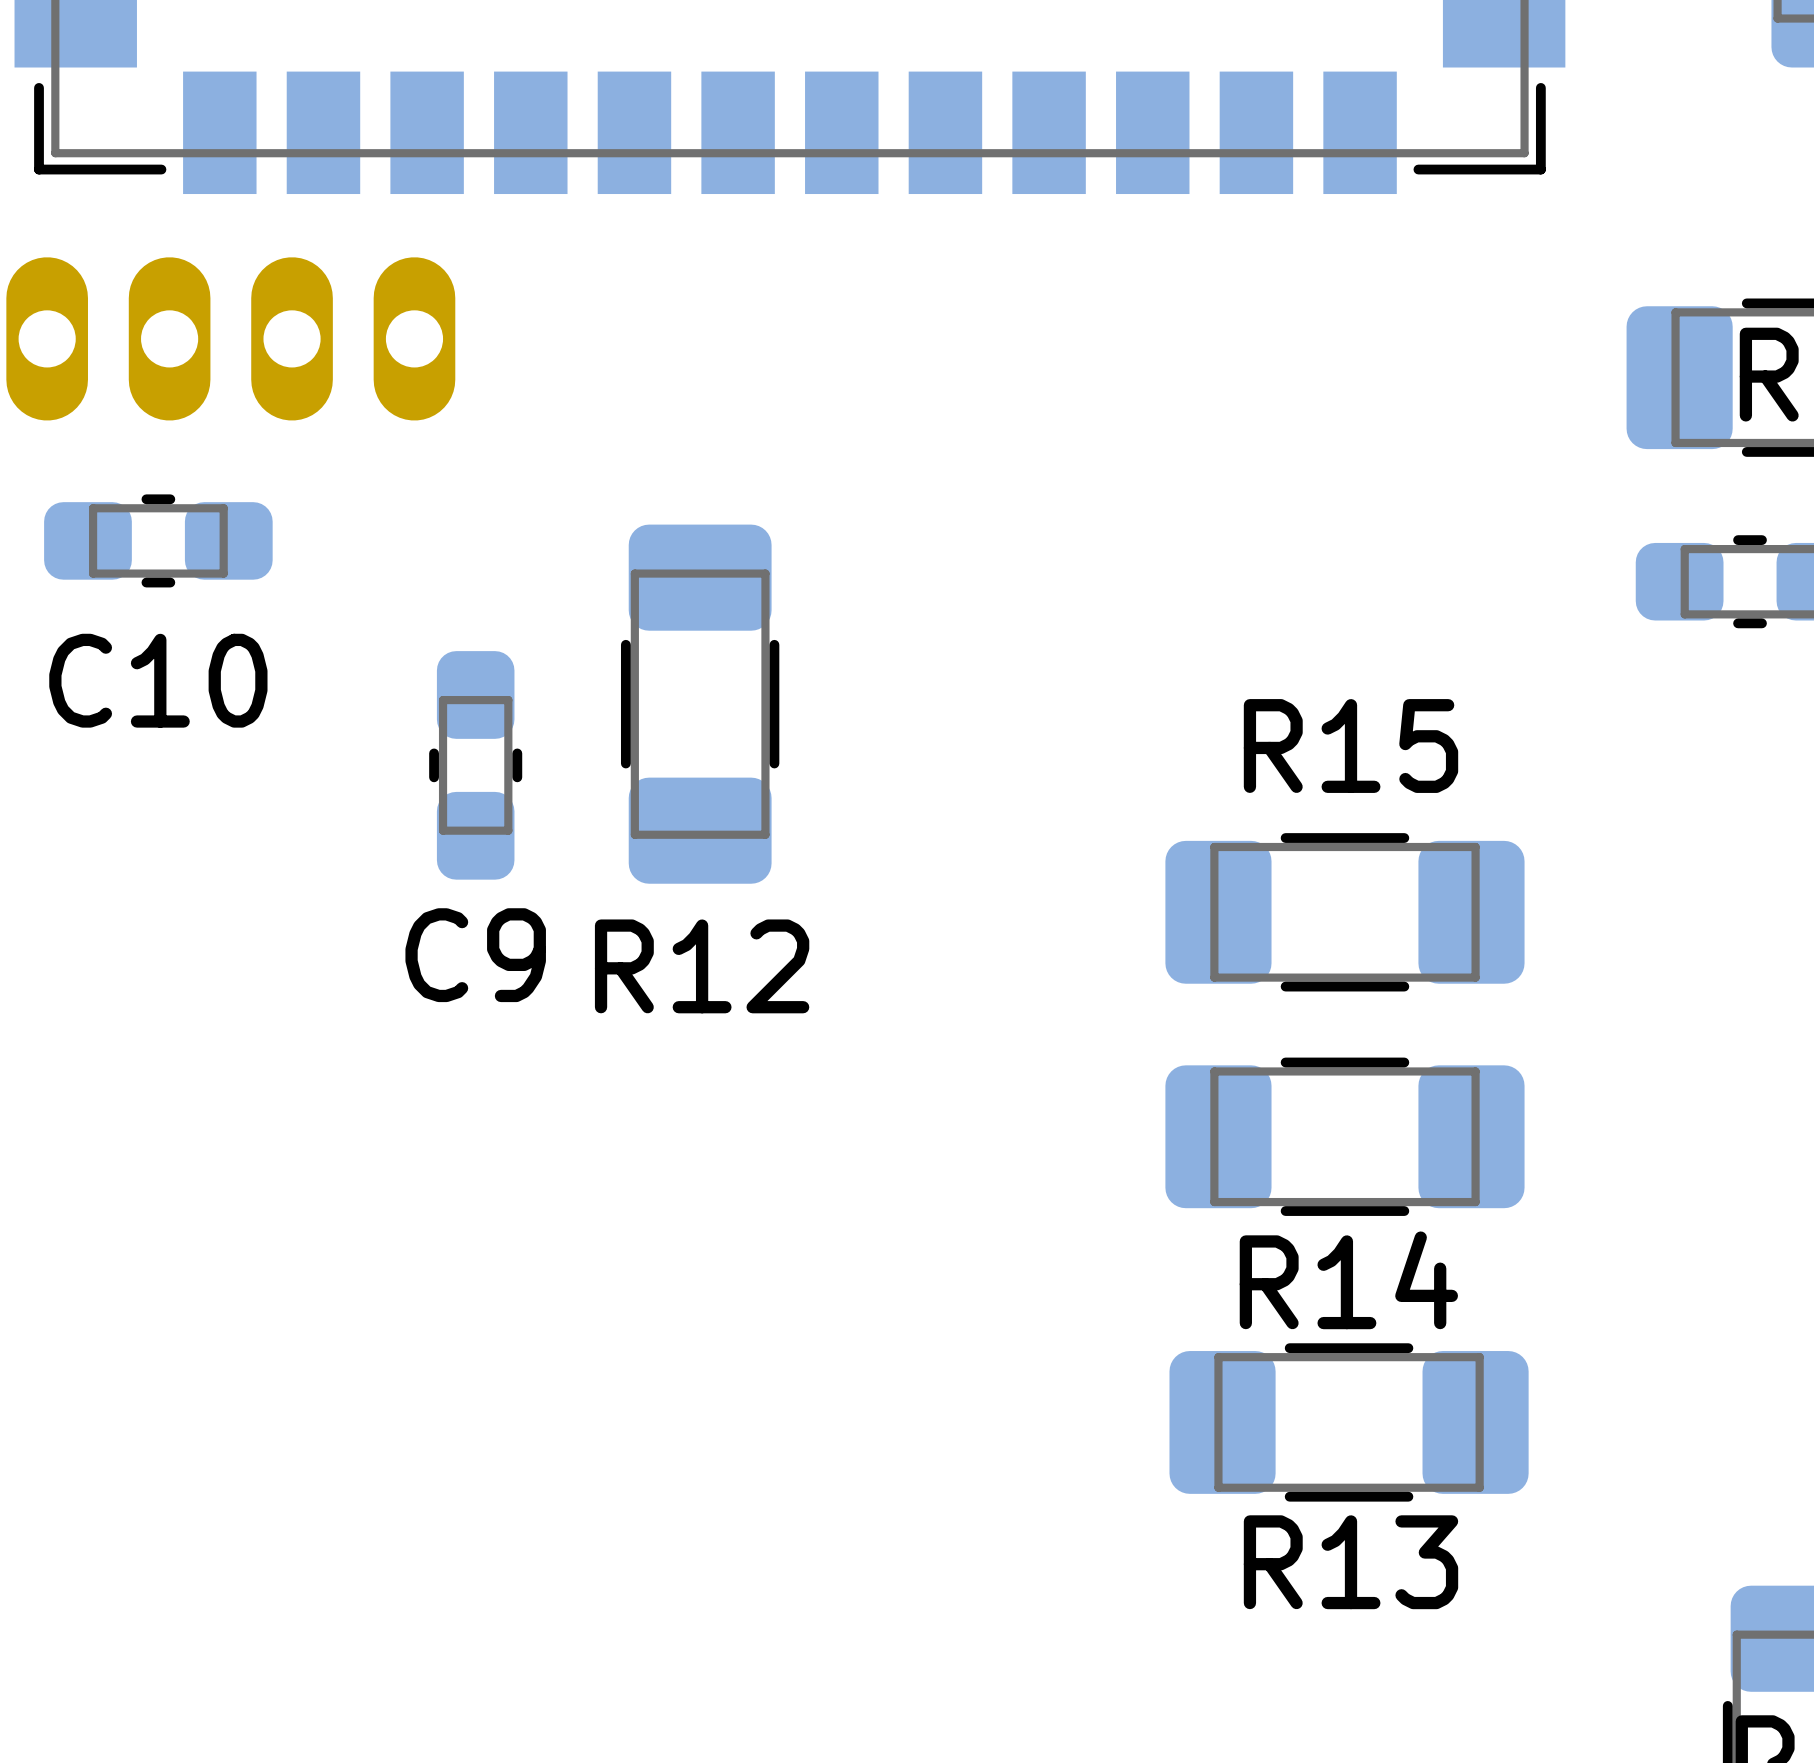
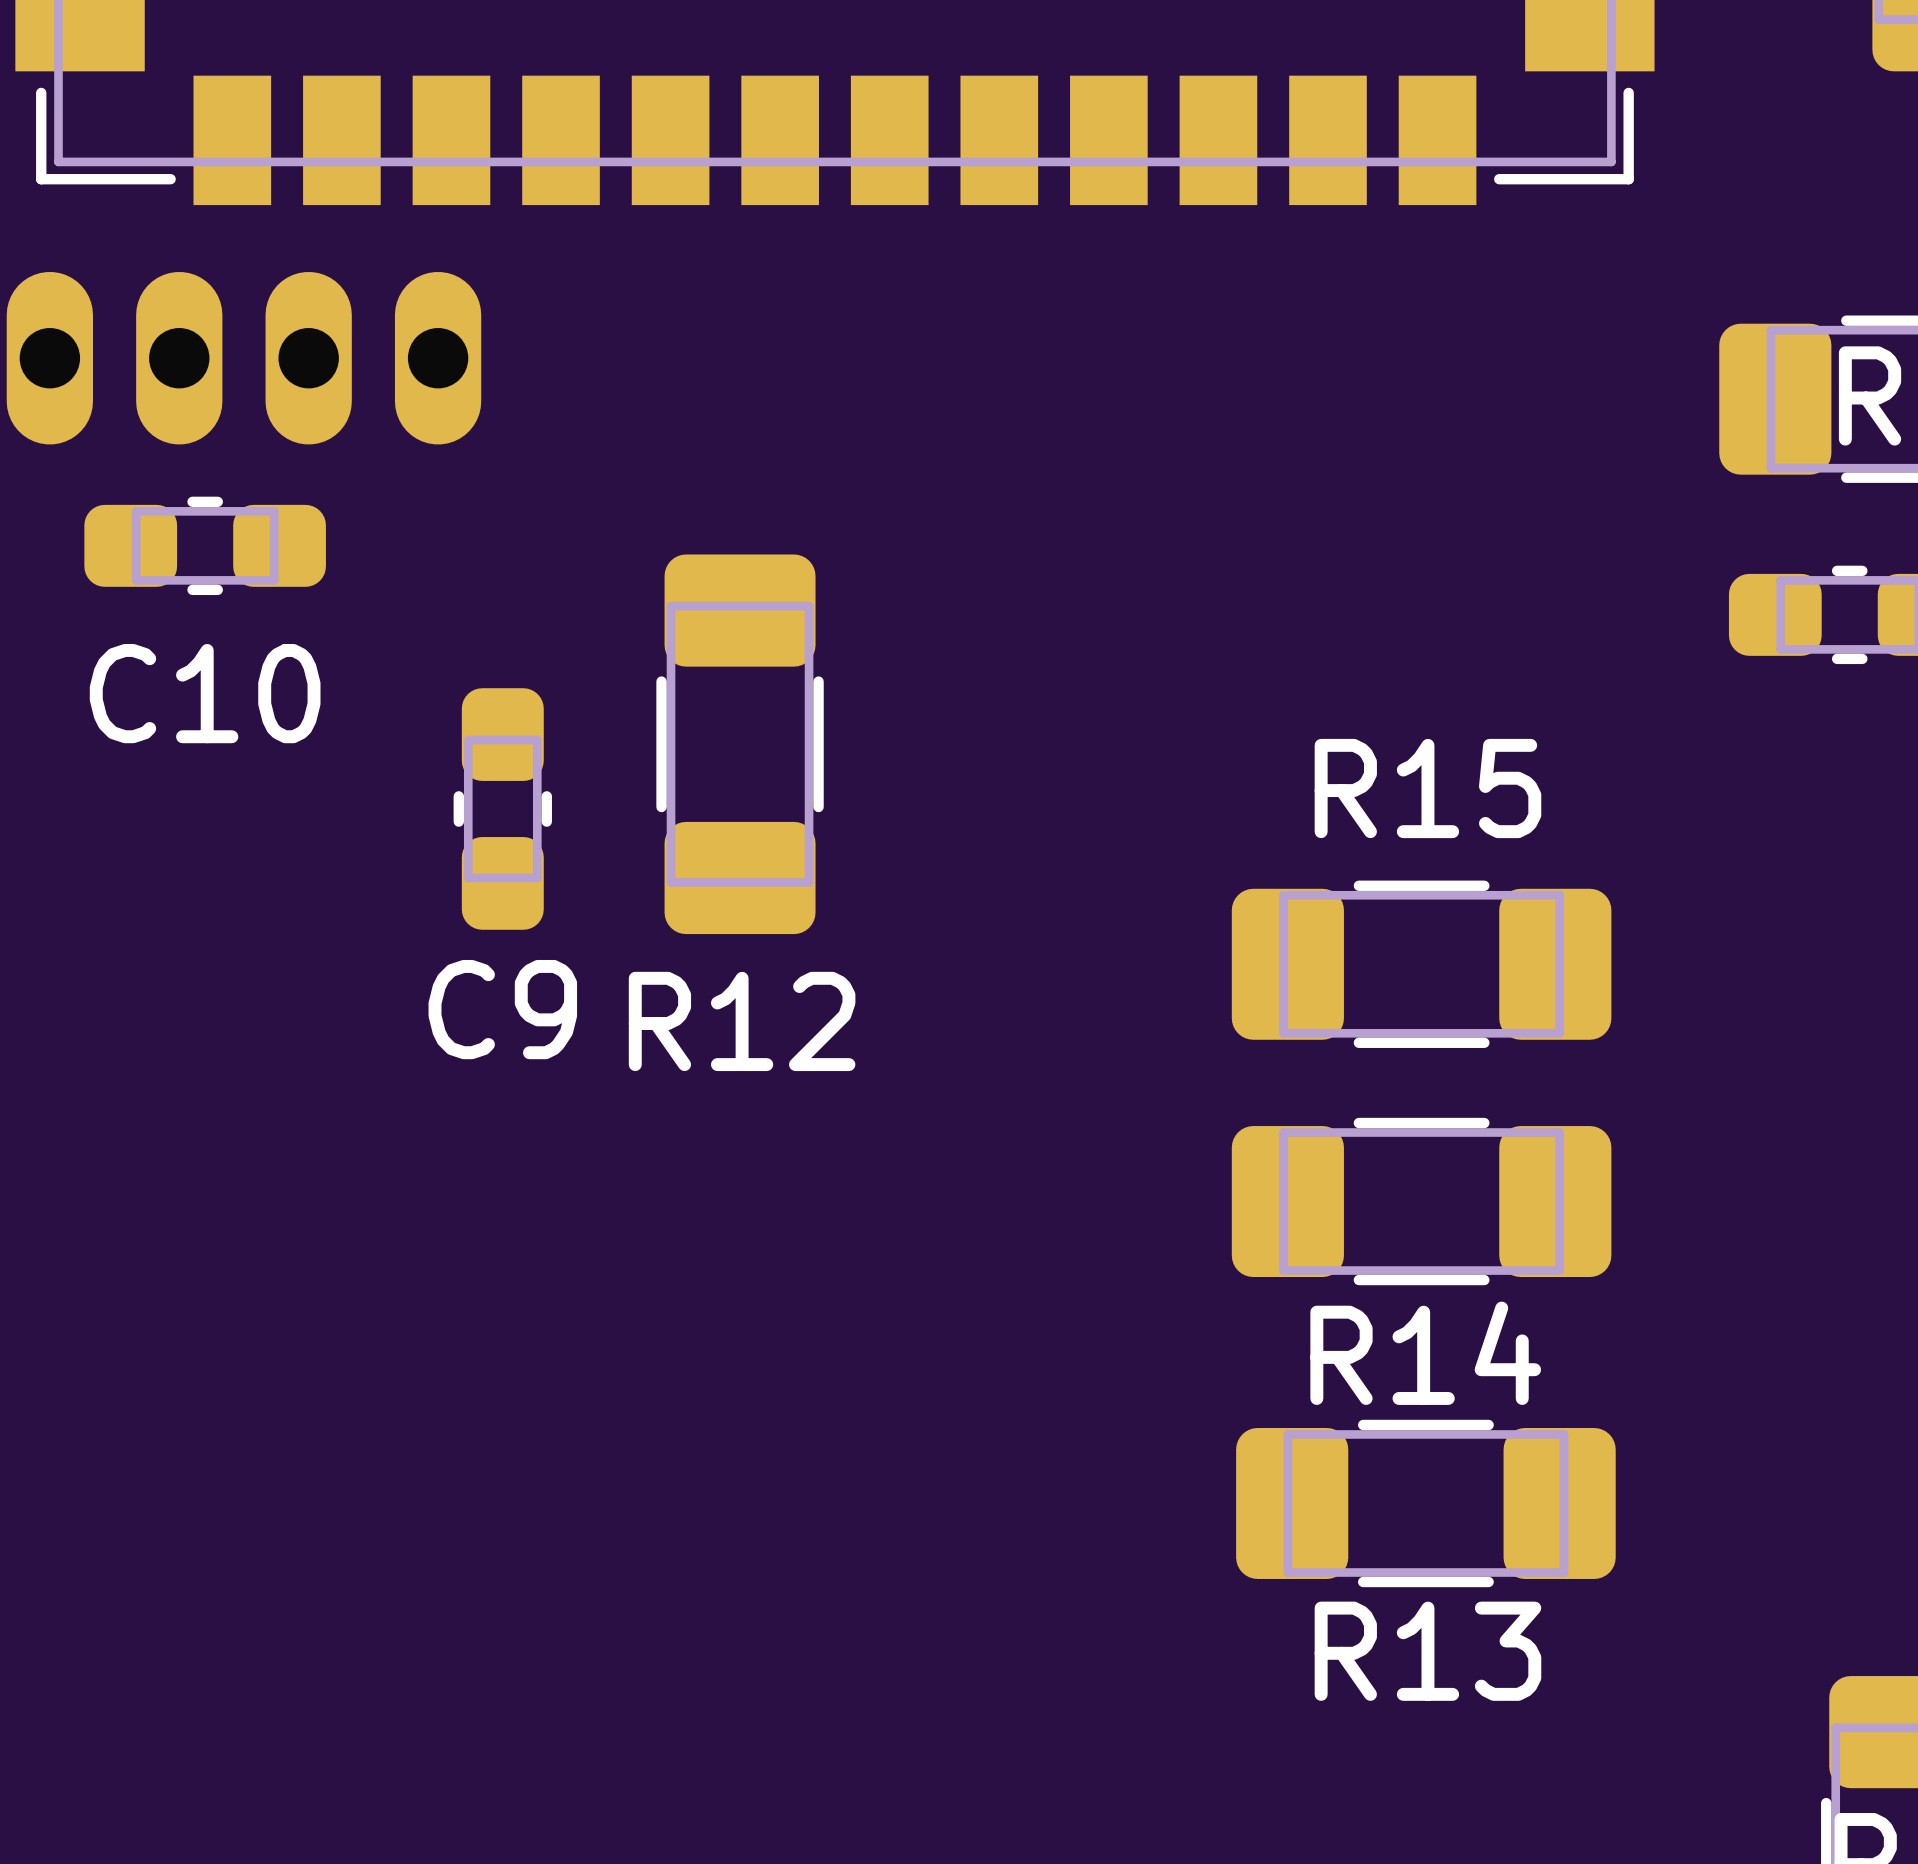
C10 position: (158, 540) -> (205, 545)

